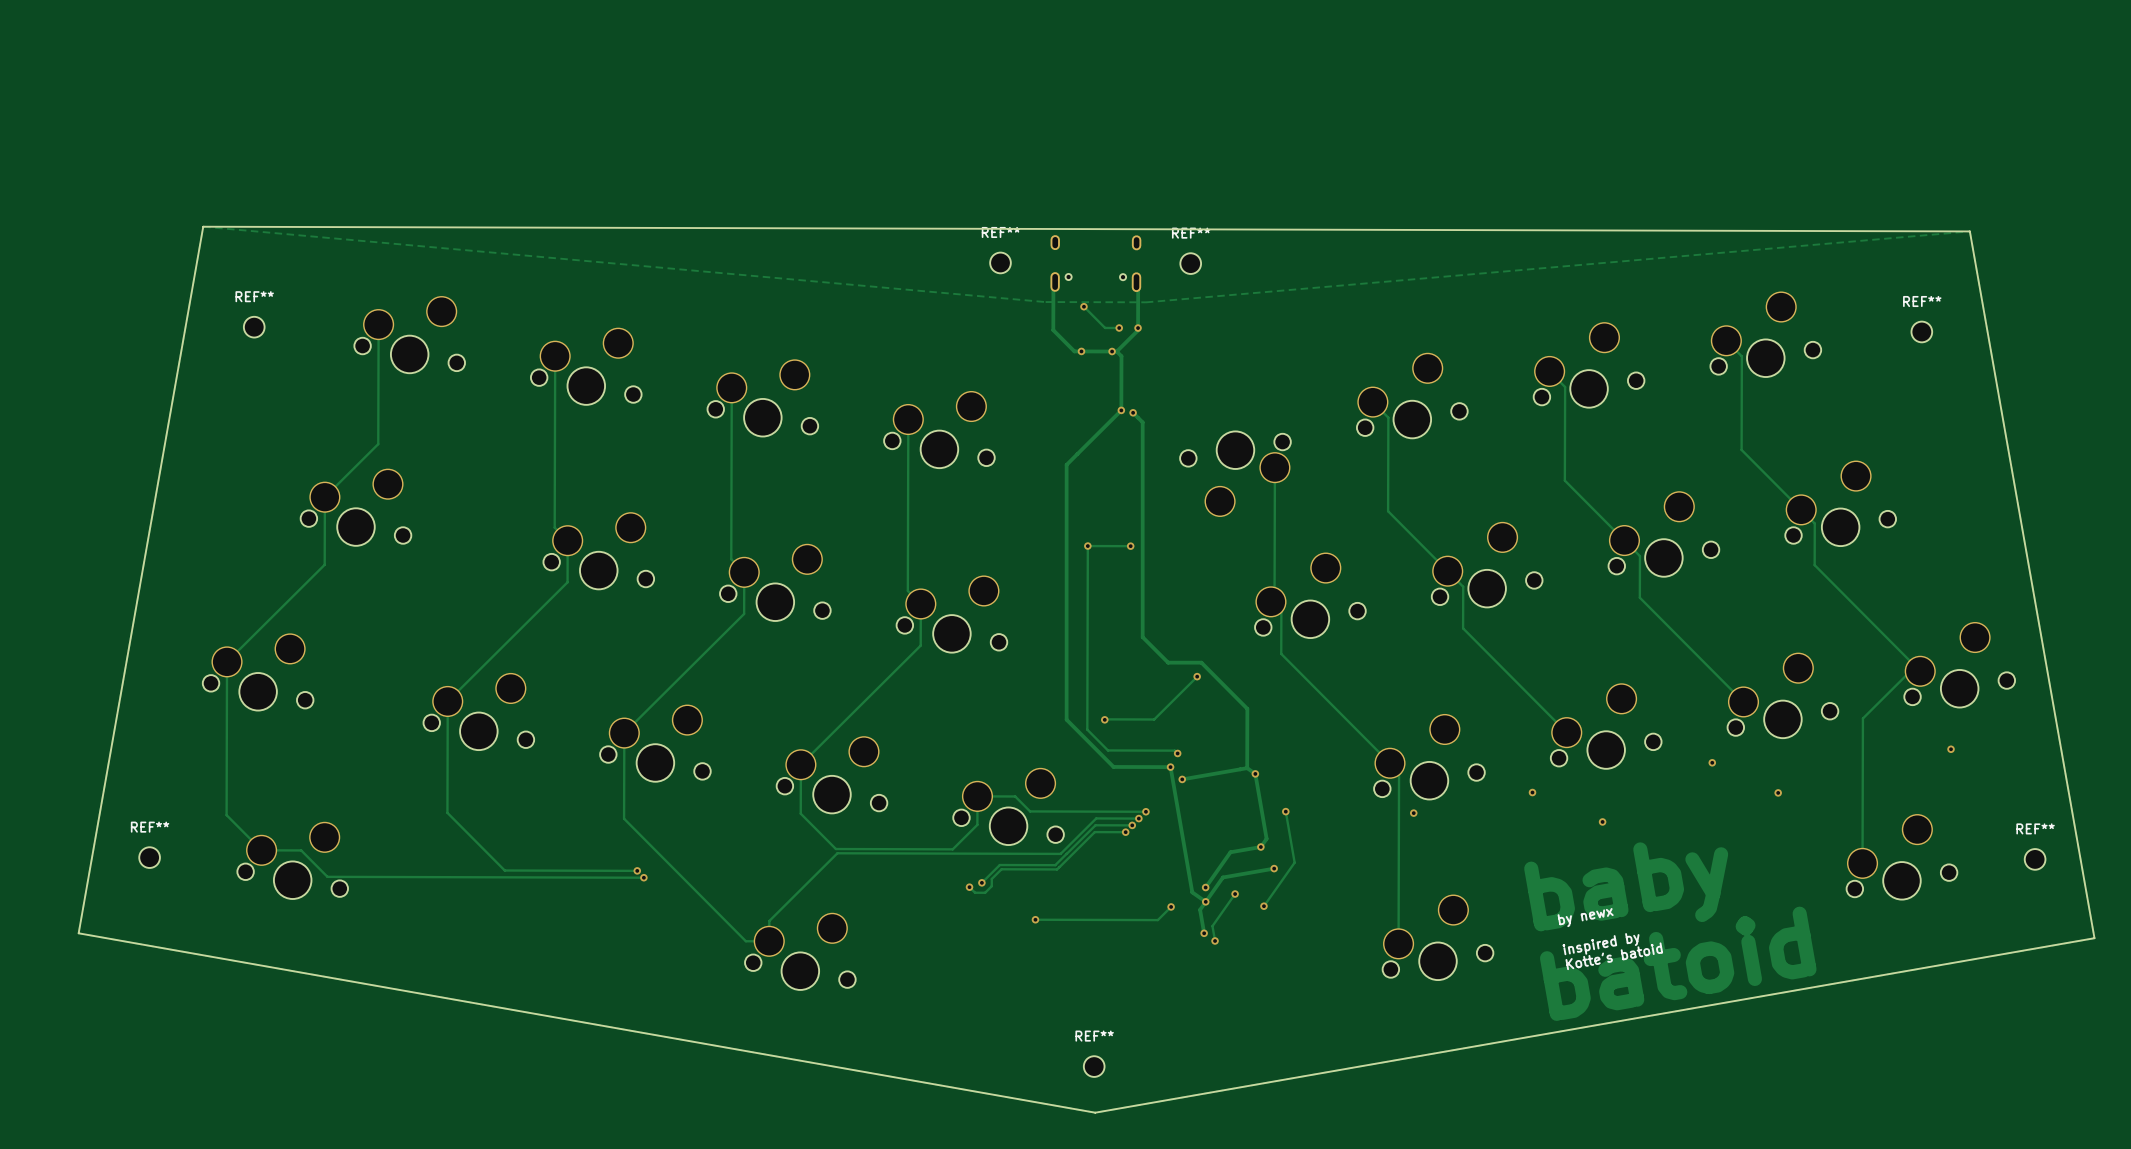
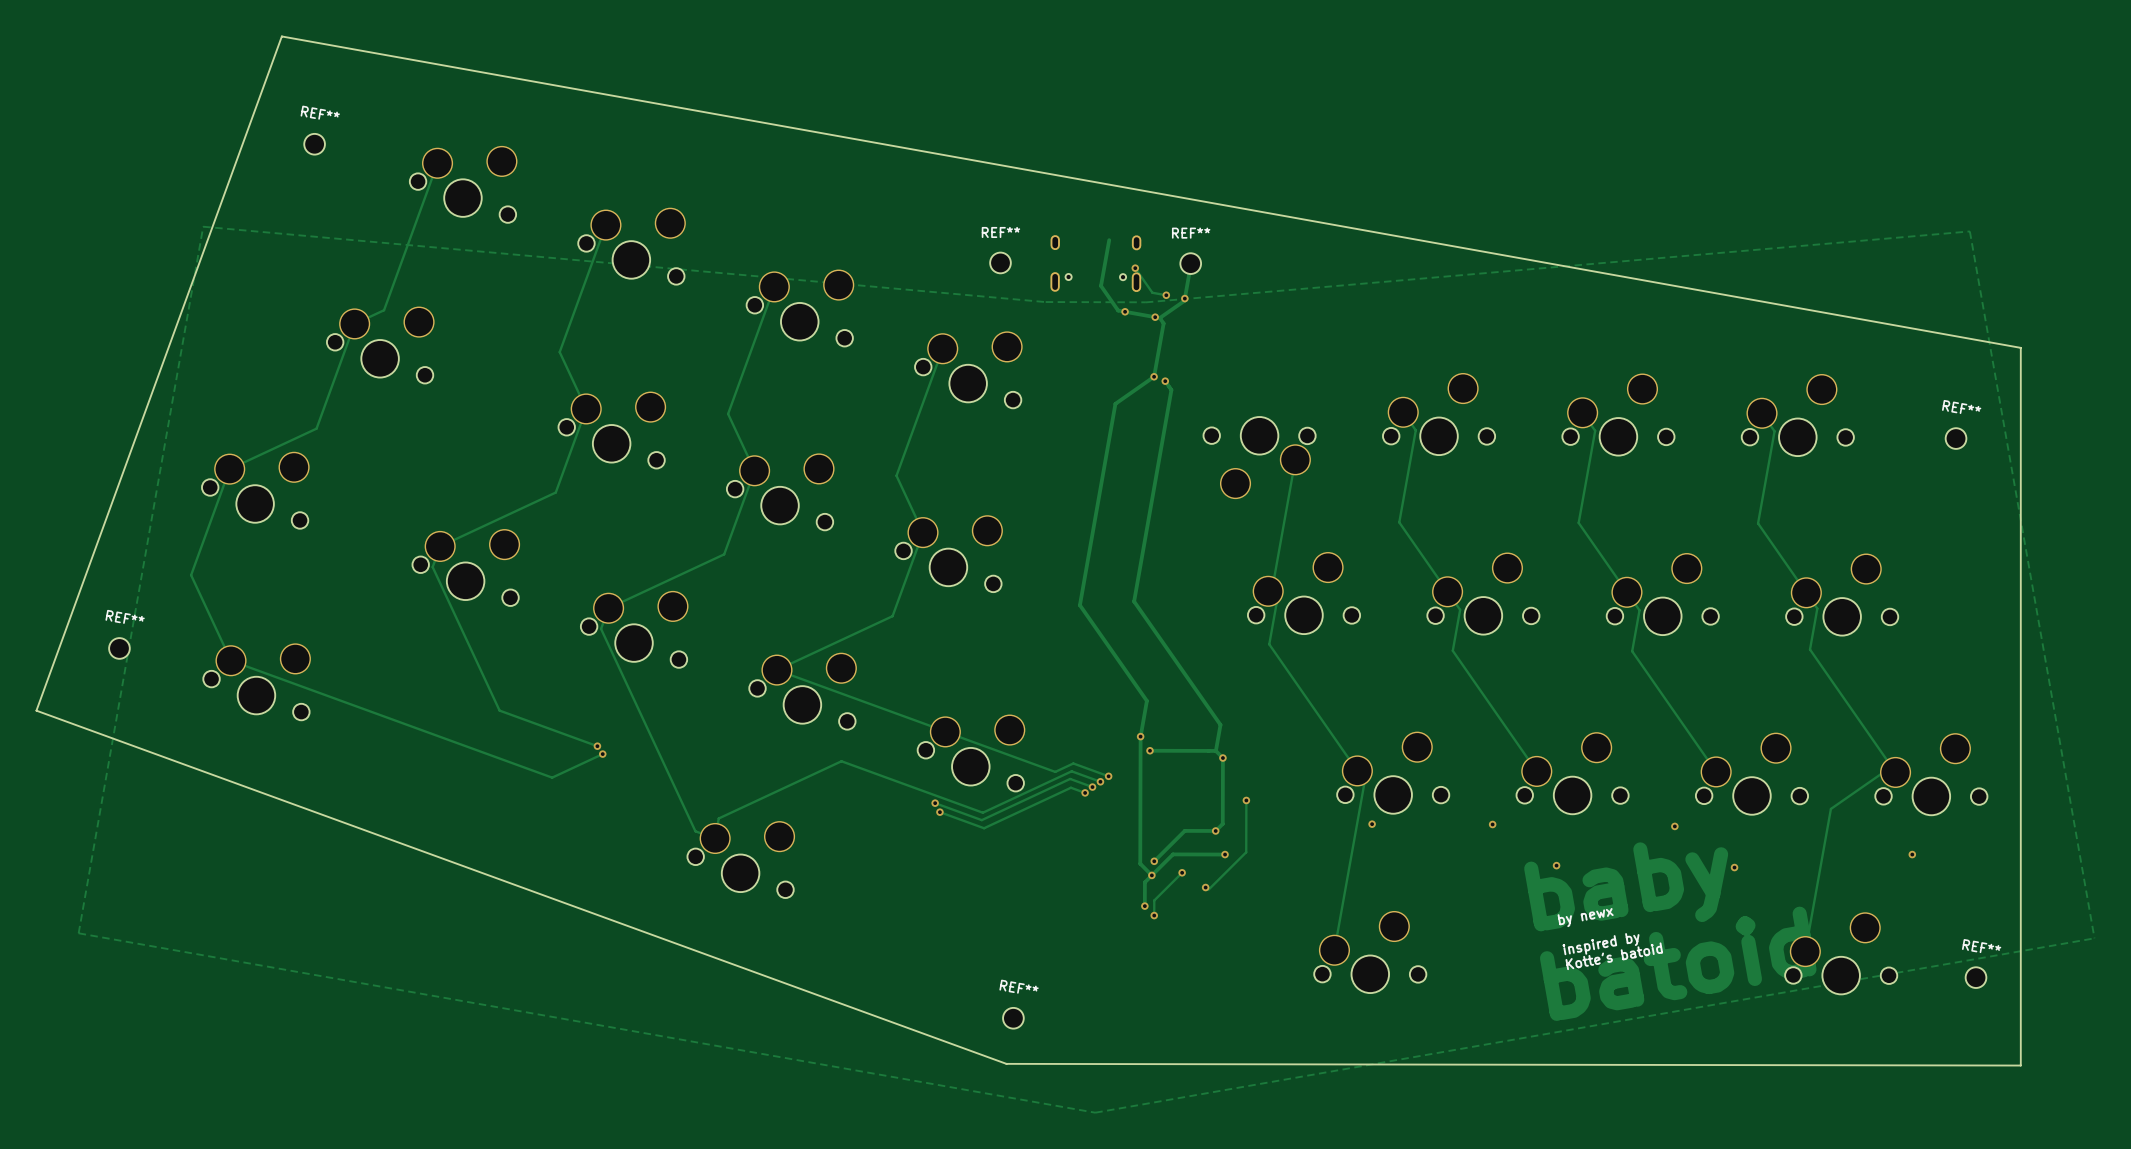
REF**: none -> (314, 144)
track: none -> (437, 163) (384, 310) (354, 323) (316, 428) (229, 469) (191, 575) (231, 660) (552, 777) (602, 754)
part: none -> (463, 184)
track: none -> (605, 225) (559, 352) (586, 408) (555, 492) (440, 546) (432, 567) (499, 710) (597, 746)
board edge: (203, 226) (78, 933) (1095, 1112) (2094, 938) (1969, 231) (203, 226) -> (281, 36) (36, 710) (1006, 1063) (2020, 1065) (2020, 347) (281, 36)
track: none -> (1109, 240) (1101, 285) (1118, 310) (1159, 318)
part: none -> (632, 246)
track: none -> (1192, 255) (1184, 300) (1159, 318)
track: none -> (1135, 268) (1152, 292) (1166, 295)
via: none -> (1135, 268)
track: (1053, 283) (1053, 330) (1074, 351) (1116, 351) -> none
track: (1138, 283) (1138, 330) (1116, 351) -> none
track: none -> (774, 286) (728, 413) (754, 470) (724, 554) (608, 608) (601, 628) (695, 831) (715, 838) (718, 818) (841, 761) (982, 812) (1071, 771) (1100, 781)
via: none -> (1166, 295)
via: none -> (1184, 298)
REF** name rotation: 0° (1922, 301) -> 10° clockwise (1961, 406)
track: (1083, 306) (1105, 327) (1119, 328) -> none
via: (1083, 306) -> none
part: none -> (800, 308)
via: none -> (1125, 311)
via: none -> (1155, 317)
track: none -> (1159, 318) (1163, 323) (1154, 376)
track: (378, 324) (378, 444) (324, 497) (324, 564) (227, 661) (226, 815) (261, 850) (301, 850) (327, 876) (643, 877) -> none
REF**: (254, 327) -> none
via: (1119, 328) -> none
via: (1138, 328) -> none
REF** position: (1921, 331) -> (1956, 438)
part: (409, 334) -> none
part: (1765, 334) -> none
track: (1726, 340) (1741, 356) (1741, 449) (1814, 523) (1814, 565) (1920, 671) (1910, 671) (1862, 718) (1862, 863) -> none
part: none -> (380, 345)
track: none -> (942, 348) (896, 475) (923, 532) (892, 616) (776, 670) (1055, 771) (1073, 763) (1108, 776)
via: (1081, 351) -> none
via: (1112, 351) -> none
track: (1116, 351) (1121, 356) (1121, 410) (1066, 464) (1066, 719) (1113, 766) (1170, 767) (1192, 892) (1205, 901) -> none
track: (555, 356) (554, 527) (567, 540) (567, 582) (447, 701) (447, 812) (504, 870) (637, 870) -> none
part: (1589, 364) -> none
part: (586, 366) -> none
part: none -> (968, 369)
track: (1549, 371) (1565, 387) (1564, 480) (1639, 556) (1639, 597) (1743, 701) -> none
track: none -> (1154, 376) (1115, 403) (1079, 605) (1146, 700) (1140, 736) (1140, 863) (1151, 875)
via: none -> (1154, 376)
track: none -> (1165, 381) (1171, 390) (1134, 601) (1220, 724) (1215, 750)
via: none -> (1165, 381)
track: (731, 387) (731, 559) (744, 572) (744, 613) (624, 733) (624, 818) (745, 941) (769, 941) (769, 921) (837, 853) (1060, 853) (1096, 818) (1138, 818) -> none
part: (1412, 395) -> none
part: (762, 397) -> none
track: (1372, 402) (1388, 417) (1388, 511) (1463, 586) (1463, 628) (1566, 732) -> none
via: (1121, 410) -> none
track: (1133, 412) (1142, 422) (1142, 637) (1168, 662) (1201, 662) (1247, 708) (1247, 768) -> none
via: (1133, 412) -> none
track: none -> (1403, 412) (1415, 430) (1399, 522) (1460, 609) (1452, 650) (1536, 771)
track: none -> (1582, 412) (1595, 430) (1578, 522) (1639, 610) (1632, 651) (1716, 771)
track: none -> (1762, 413) (1774, 431) (1758, 523) (1817, 608) (1810, 649) (1895, 772) (1885, 770) (1830, 808) (1805, 951)
part: none -> (1439, 414)
part: none -> (1618, 414)
part: none -> (1797, 415)
track: (908, 419) (907, 590) (920, 603) (920, 645) (800, 764) (800, 813) (835, 849) (952, 849) (977, 824) (977, 796) (1015, 796) (1030, 811) (1145, 811) -> none
part: (939, 429) -> none
part: none -> (612, 430)
part: none -> (1259, 458)
track: none -> (1295, 459) (1272, 588) (1268, 591) (1276, 603) (1269, 644) (1364, 781) (1334, 950)
track: (1274, 467) (1274, 598) (1270, 601) (1281, 612) (1281, 653) (1399, 772) (1398, 943) -> none
part: (1235, 474) -> none
part: none -> (255, 490)
part: none -> (780, 491)
part: (1840, 503) -> none
part: (355, 507) -> none
part: (1663, 533) -> none
via: (1087, 546) -> none
track: (1130, 546) (1087, 546) (1087, 729) (1107, 750) (1174, 750) (1177, 753) -> none
via: (1130, 546) -> none
part: (598, 550) -> none
part: none -> (949, 553)
part: (1487, 564) -> none
part: none -> (466, 567)
part: (775, 582) -> none
part: none -> (1483, 593)
part: none -> (1662, 594)
part: none -> (1842, 594)
part rotation: 0° (1310, 595) -> 10° clockwise (1304, 593)
part: (951, 614) -> none
part: none -> (634, 629)
REF**: none -> (119, 648)
part: (1959, 664) -> none
part: (258, 671) -> none
track: (1197, 676) (1154, 719) (1104, 719) -> none
via: (1197, 676) -> none
part: none -> (257, 681)
part: none -> (803, 691)
part: (1782, 695) -> none
part: (478, 711) -> none
via: (1104, 719) -> none
part: (1606, 726) -> none
via: none -> (1140, 736)
part: (655, 743) -> none
via: none -> (597, 746)
via: (1951, 749) -> none
track: none -> (1149, 750) (1215, 750)
via: none -> (1149, 750)
track: none -> (1215, 750) (1222, 758) (1222, 823) (1215, 830) (1184, 830) (1154, 861)
part: none -> (971, 752)
via: (1177, 753) -> none
via: none -> (602, 754)
part: (1429, 756) -> none
via: none -> (1222, 758)
via: (1712, 762) -> none
via: (1170, 767) -> none
track: (1247, 768) (1255, 773) (1266, 838) (1260, 847) (1230, 852) (1205, 887) -> none
track: (1247, 768) (1182, 779) -> none
part: none -> (1393, 772)
via: (1255, 773) -> none
part: none -> (1572, 773)
part: none -> (1751, 773)
part: (831, 774) -> none
part: none -> (1931, 774)
via: none -> (1108, 776)
via: (1182, 779) -> none
via: none -> (1100, 781)
track: none -> (1092, 787) (1070, 778) (981, 820) (935, 803)
via: none -> (1092, 787)
track: none -> (1085, 792) (1070, 787) (984, 828) (939, 812)
via: none -> (1085, 792)
via: (1532, 792) -> none
via: (1778, 792) -> none
track: none -> (1246, 800) (1246, 852) (1208, 889)
via: none -> (1246, 800)
via: none -> (935, 803)
part: (1008, 806) -> none
via: (1145, 811) -> none
track: (1285, 811) (1294, 862) (1263, 906) -> none
via: (1285, 811) -> none
via: none -> (939, 812)
via: (1413, 813) -> none
via: (1138, 818) -> none
via: (1602, 821) -> none
via: none -> (1372, 824)
via: none -> (1492, 824)
track: (1132, 825) (1095, 825) (1066, 853) -> none
via: (1132, 825) -> none
via: none -> (1674, 826)
REF** name rotation: 0° (2035, 828) -> 10° clockwise (1981, 946)
via: none -> (1215, 830)
track: (1125, 832) (1094, 832) (1057, 869) (1001, 869) (991, 878) (991, 886) (985, 892) (975, 892) (969, 887) -> none
via: (1125, 832) -> none
via: (1260, 847) -> none
track: (1066, 853) (1055, 865) (999, 865) (981, 882) -> none
track: none -> (1225, 854) (1172, 854) (1144, 882) (1144, 906)
via: none -> (1225, 854)
via: none -> (1912, 854)
part: (1901, 856) -> none
REF**: (149, 857) -> none
part: none -> (741, 859)
REF** position: (2035, 859) -> (1976, 977)
part: (292, 860) -> none
via: none -> (1154, 861)
via: none -> (1556, 865)
via: none -> (1734, 867)
track: (1274, 868) (1222, 877) (1200, 909) (1204, 933) -> none
via: (1274, 868) -> none
via: (637, 870) -> none
track: none -> (1182, 872) (1154, 900) (1154, 915)
via: none -> (1182, 872)
via: none -> (1151, 875)
via: (643, 877) -> none
via: (981, 882) -> none
via: (969, 887) -> none
track: (1235, 894) (1212, 926) (1215, 940) -> none
via: (1235, 894) -> none
via: (1205, 901) -> none
via: none -> (1144, 906)
track: (1171, 906) (1157, 920) (1035, 919) -> none
via: (1171, 906) -> none
via: (1263, 906) -> none
via: none -> (1154, 915)
via: (1035, 919) -> none
via: (1204, 933) -> none
part: (1438, 937) -> none
via: (1215, 940) -> none
part: (800, 951) -> none
part: none -> (1370, 952)
part: none -> (1841, 953)
REF** name rotation: 0° (1094, 1036) -> 10° clockwise (1019, 986)
REF** position: (1094, 1066) -> (1013, 1018)

